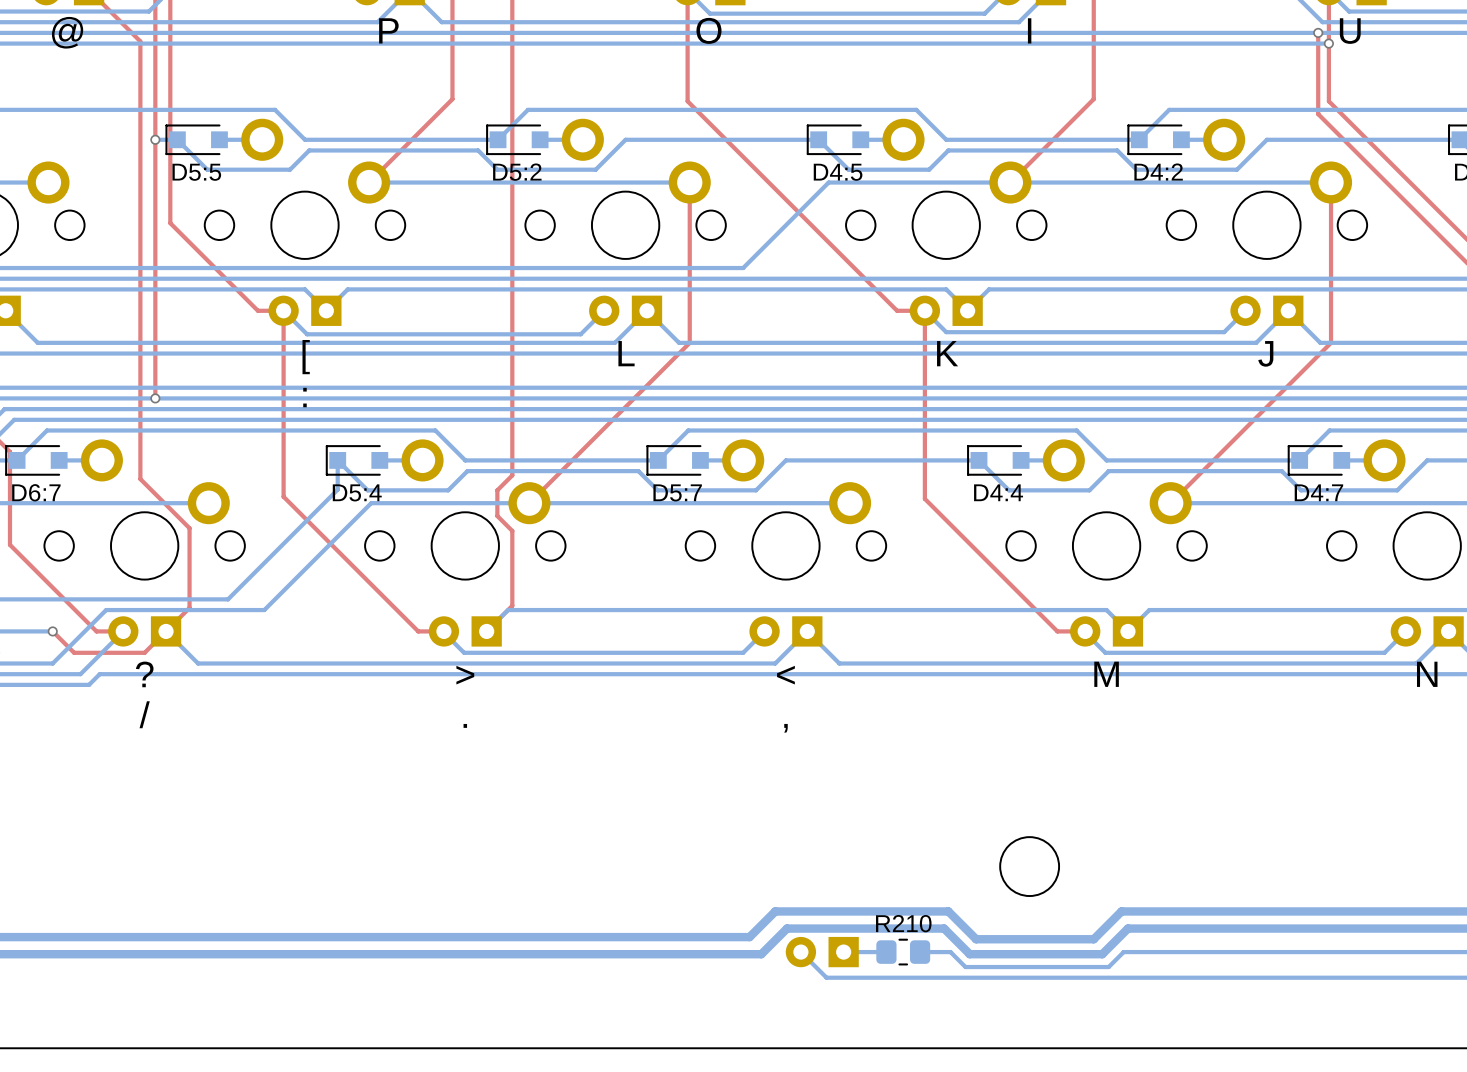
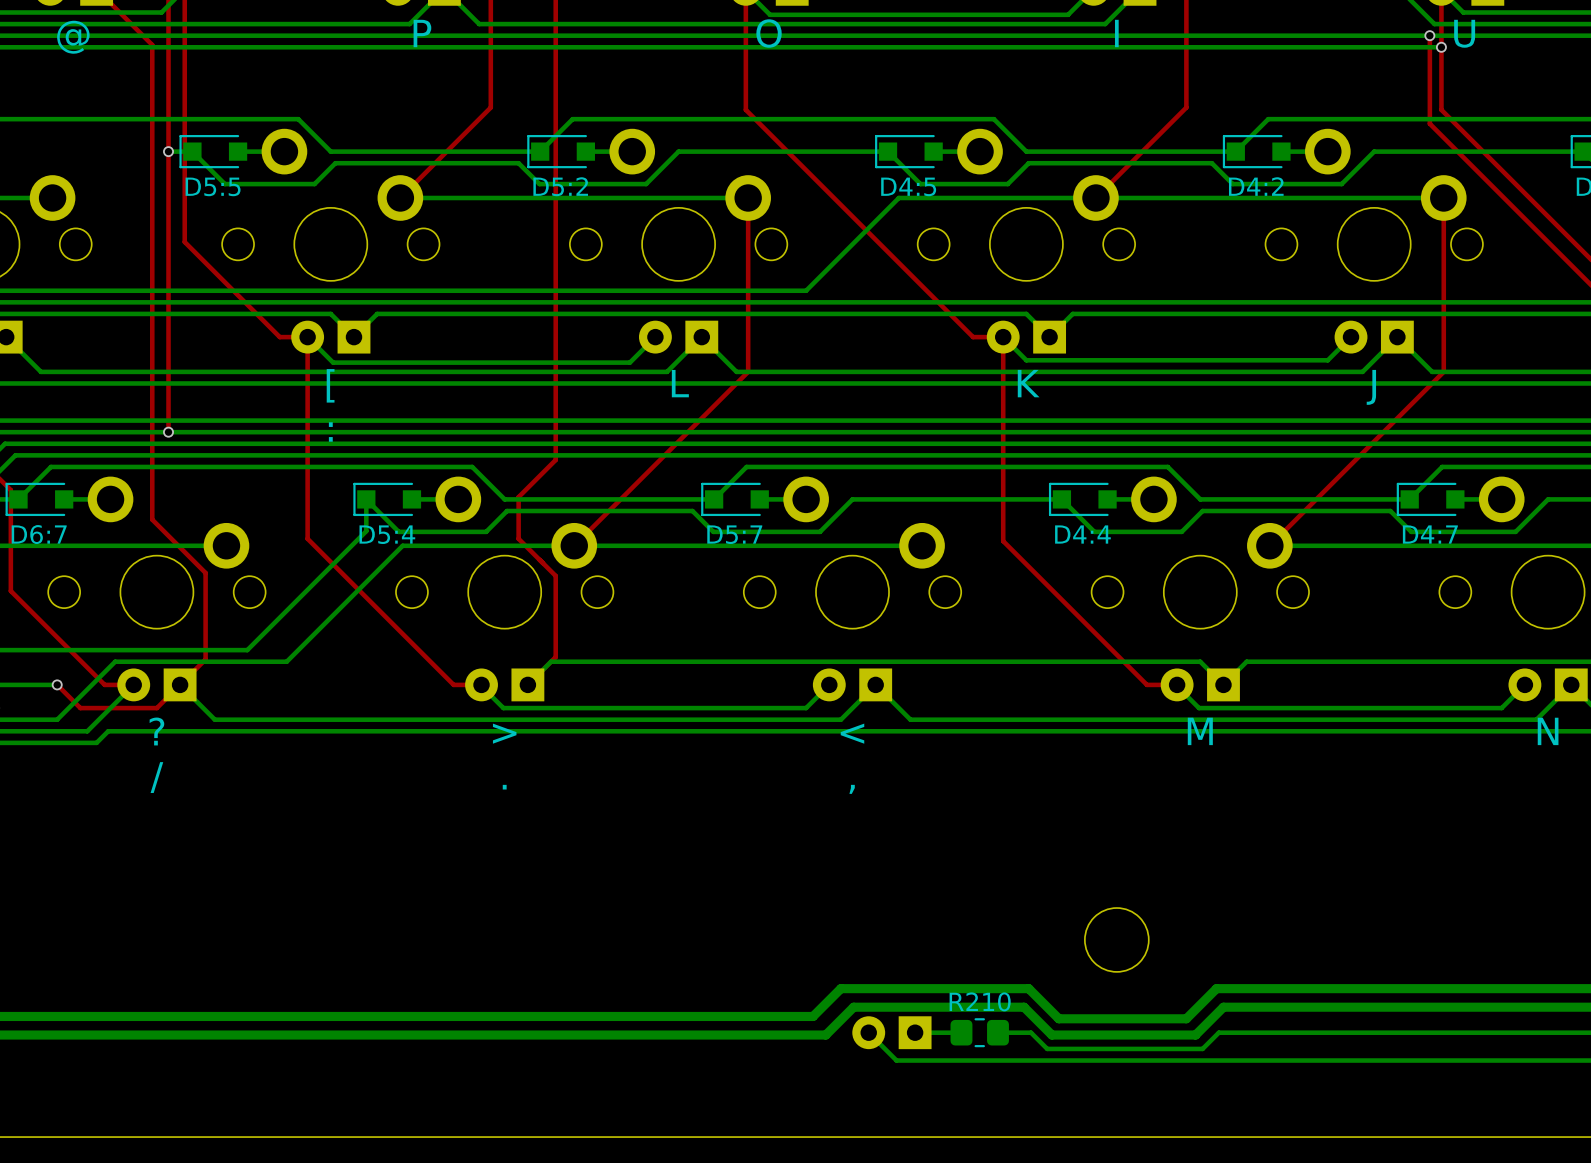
top track: (512, 424) (512, 475) (497, 490) (497, 516) -> (555, 460) (518, 497) (518, 538) (539, 559)

